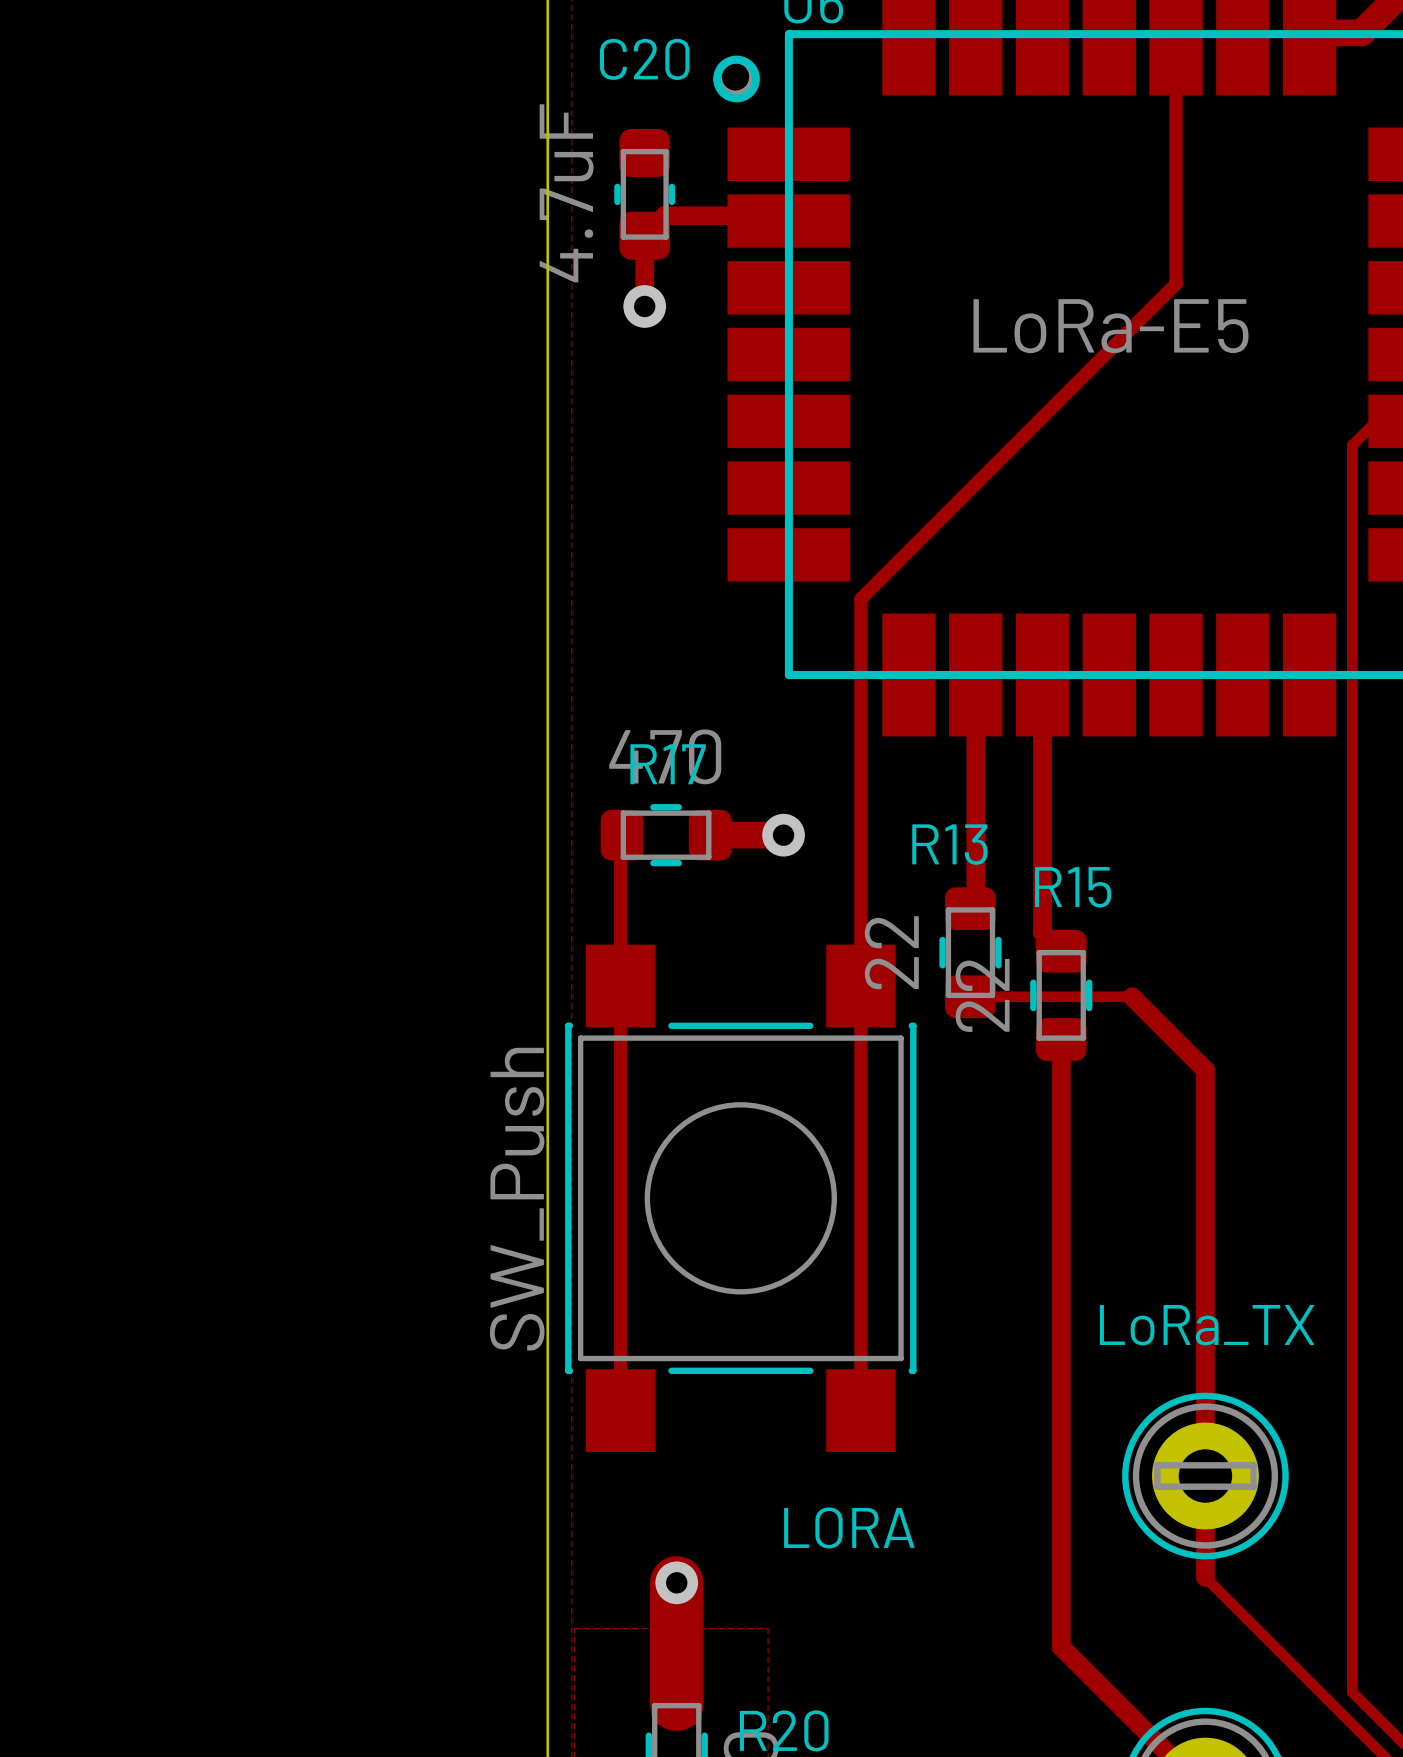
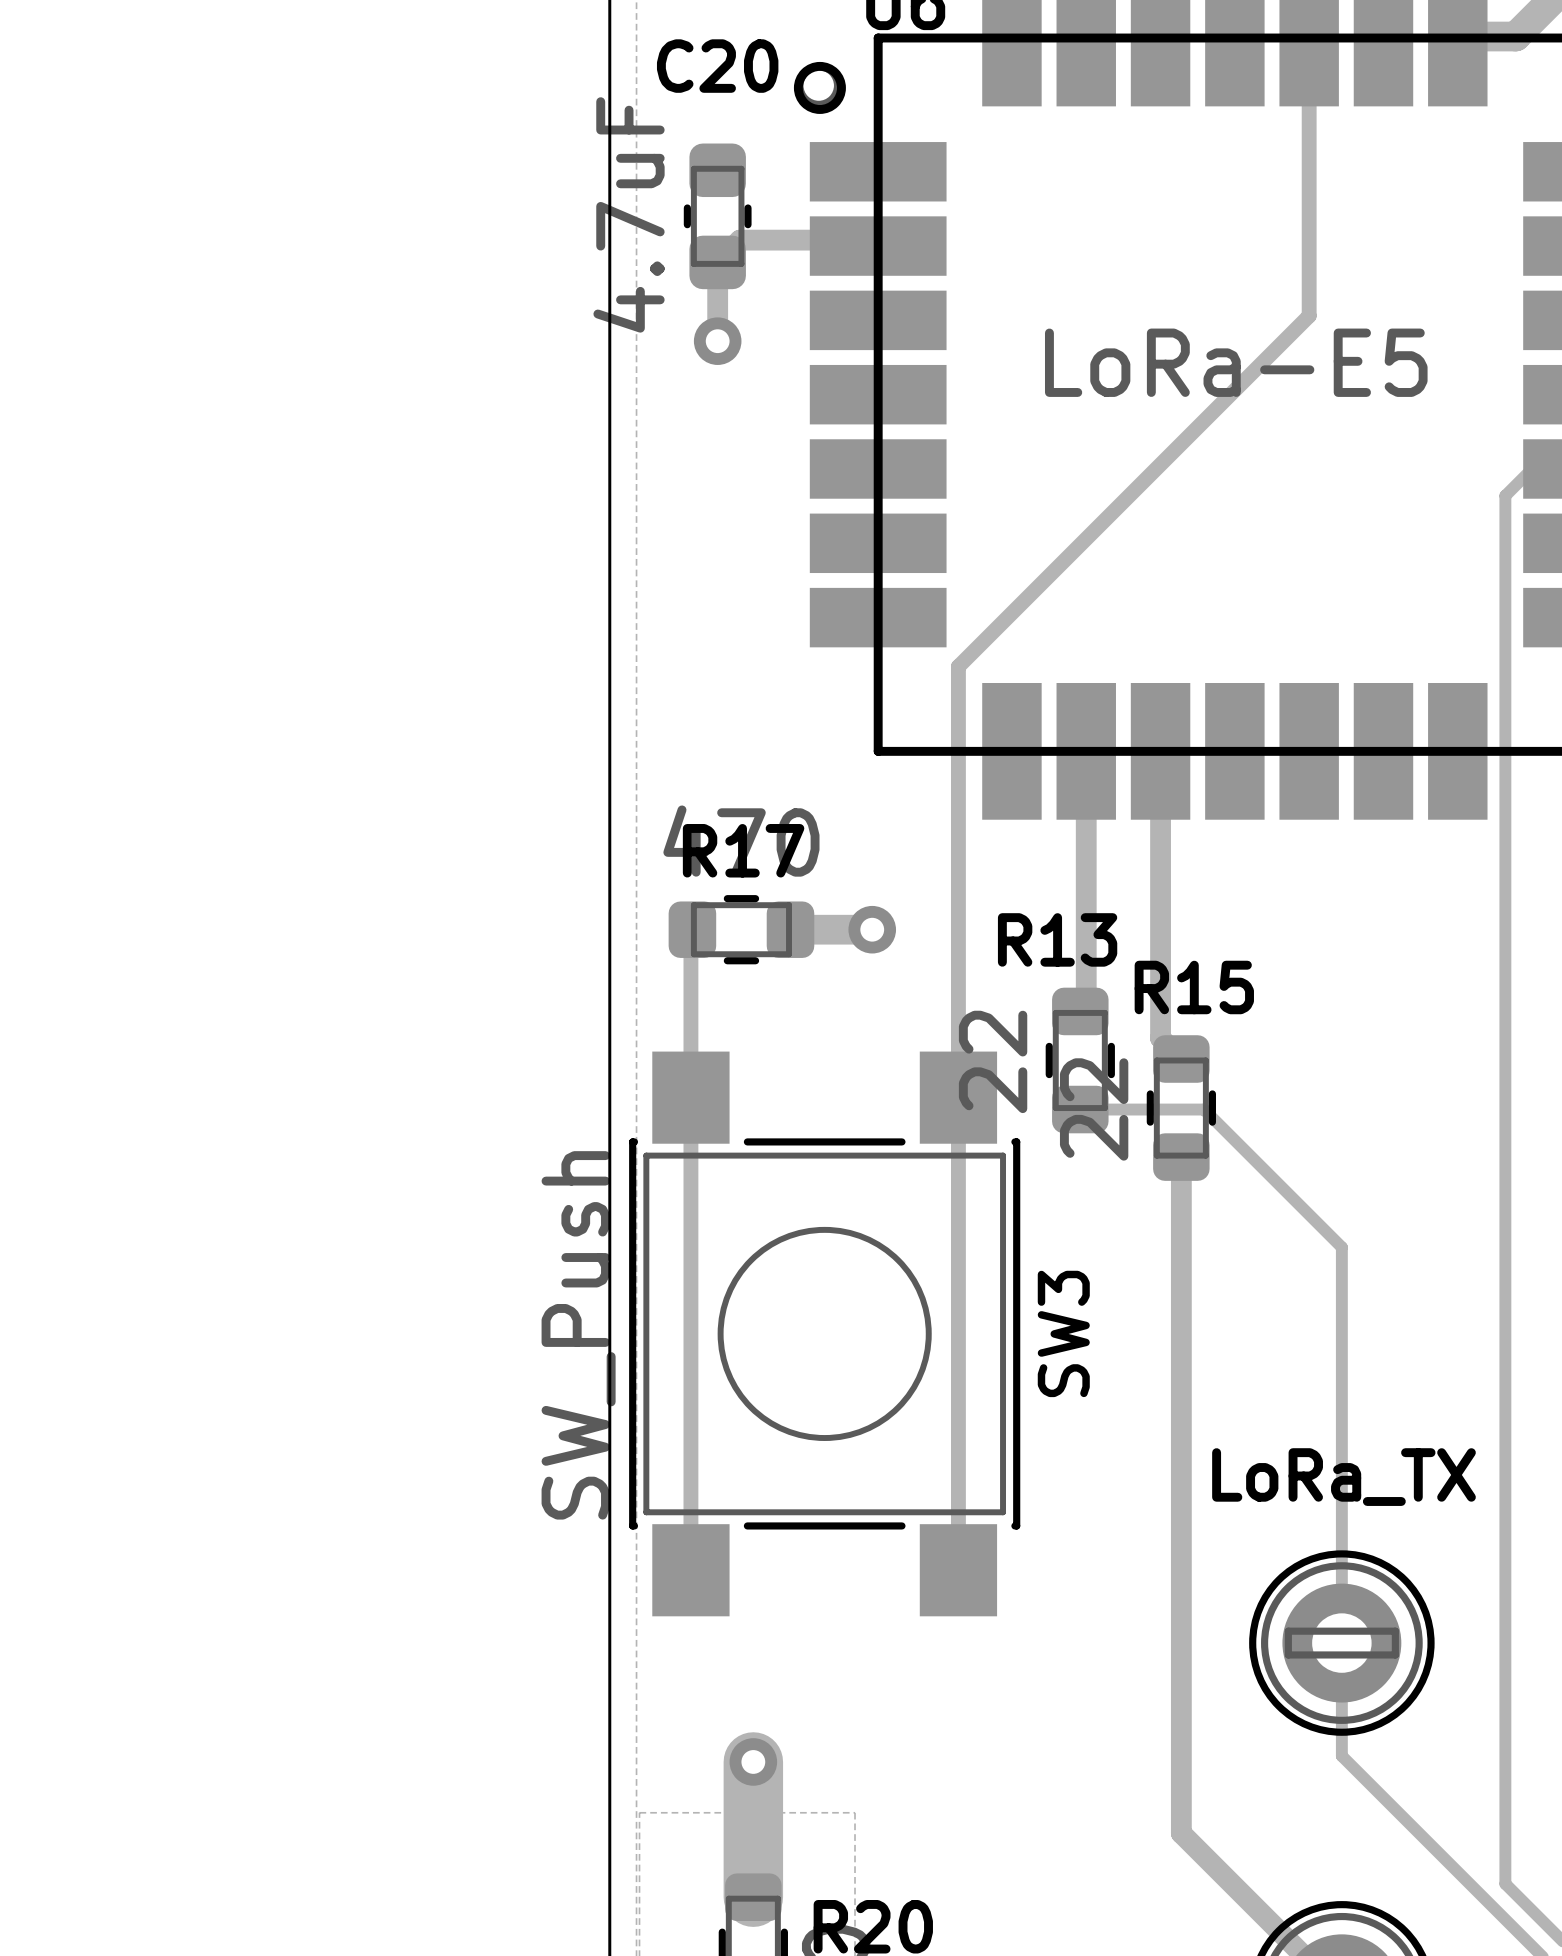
track: (1081, 996) (1132, 996) (1205, 1070) (1205, 1120) -> (1204, 1109) (1341, 1247)
track width: thick (1205, 1120) (1205, 1577) -> thin (1341, 1247) (1341, 1756)
SW3 name: none -> SW3 (1063, 1333)
text: LORA (849, 1527) -> none

